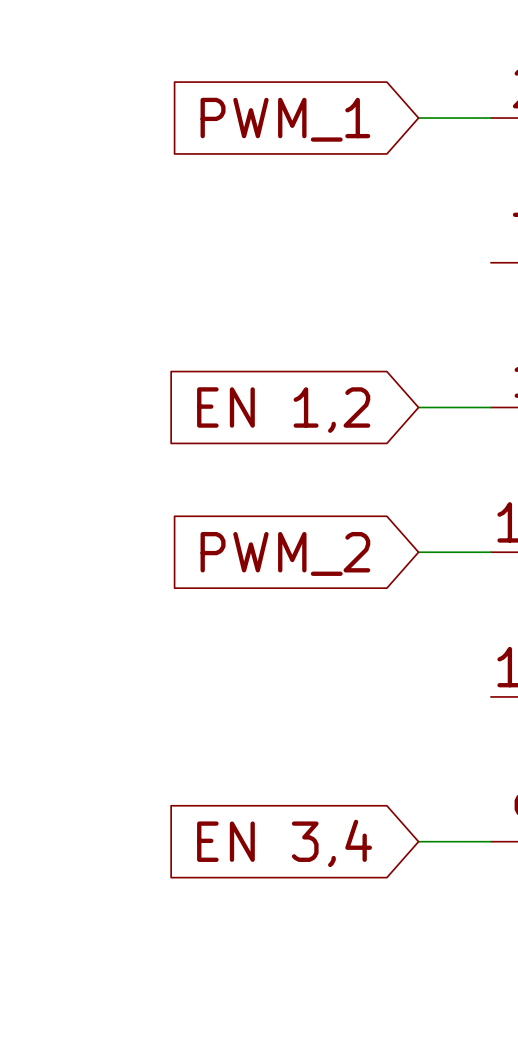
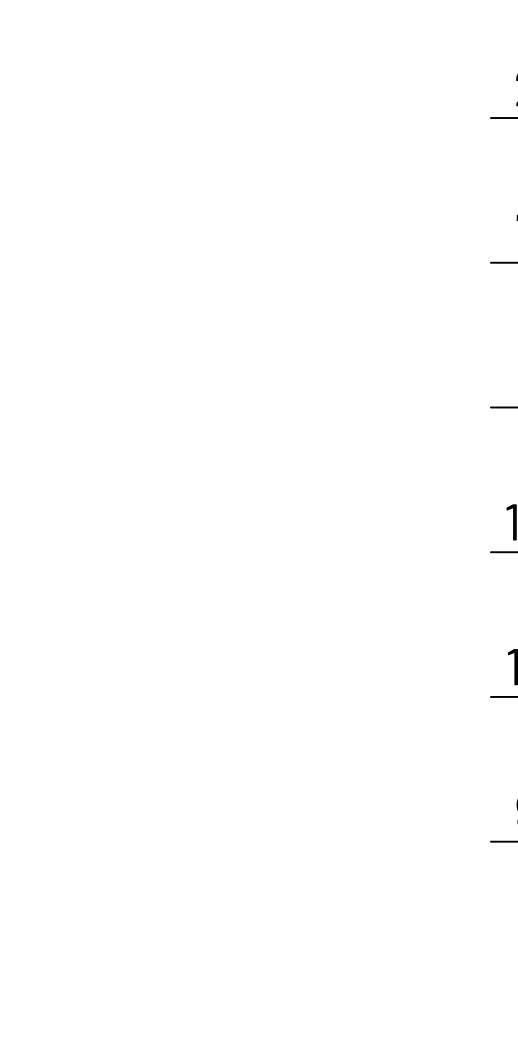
wire: (418, 118) (490, 118) -> none
global label: PWM_1 (285, 119) -> none
wire: (418, 407) (490, 407) -> none
global label: EN 1,2 (283, 410) -> none
wire: (418, 552) (490, 552) -> none
global label: PWM_2 (285, 553) -> none
wire: (418, 841) (490, 841) -> none
global label: EN 3,4 (284, 843) -> none

